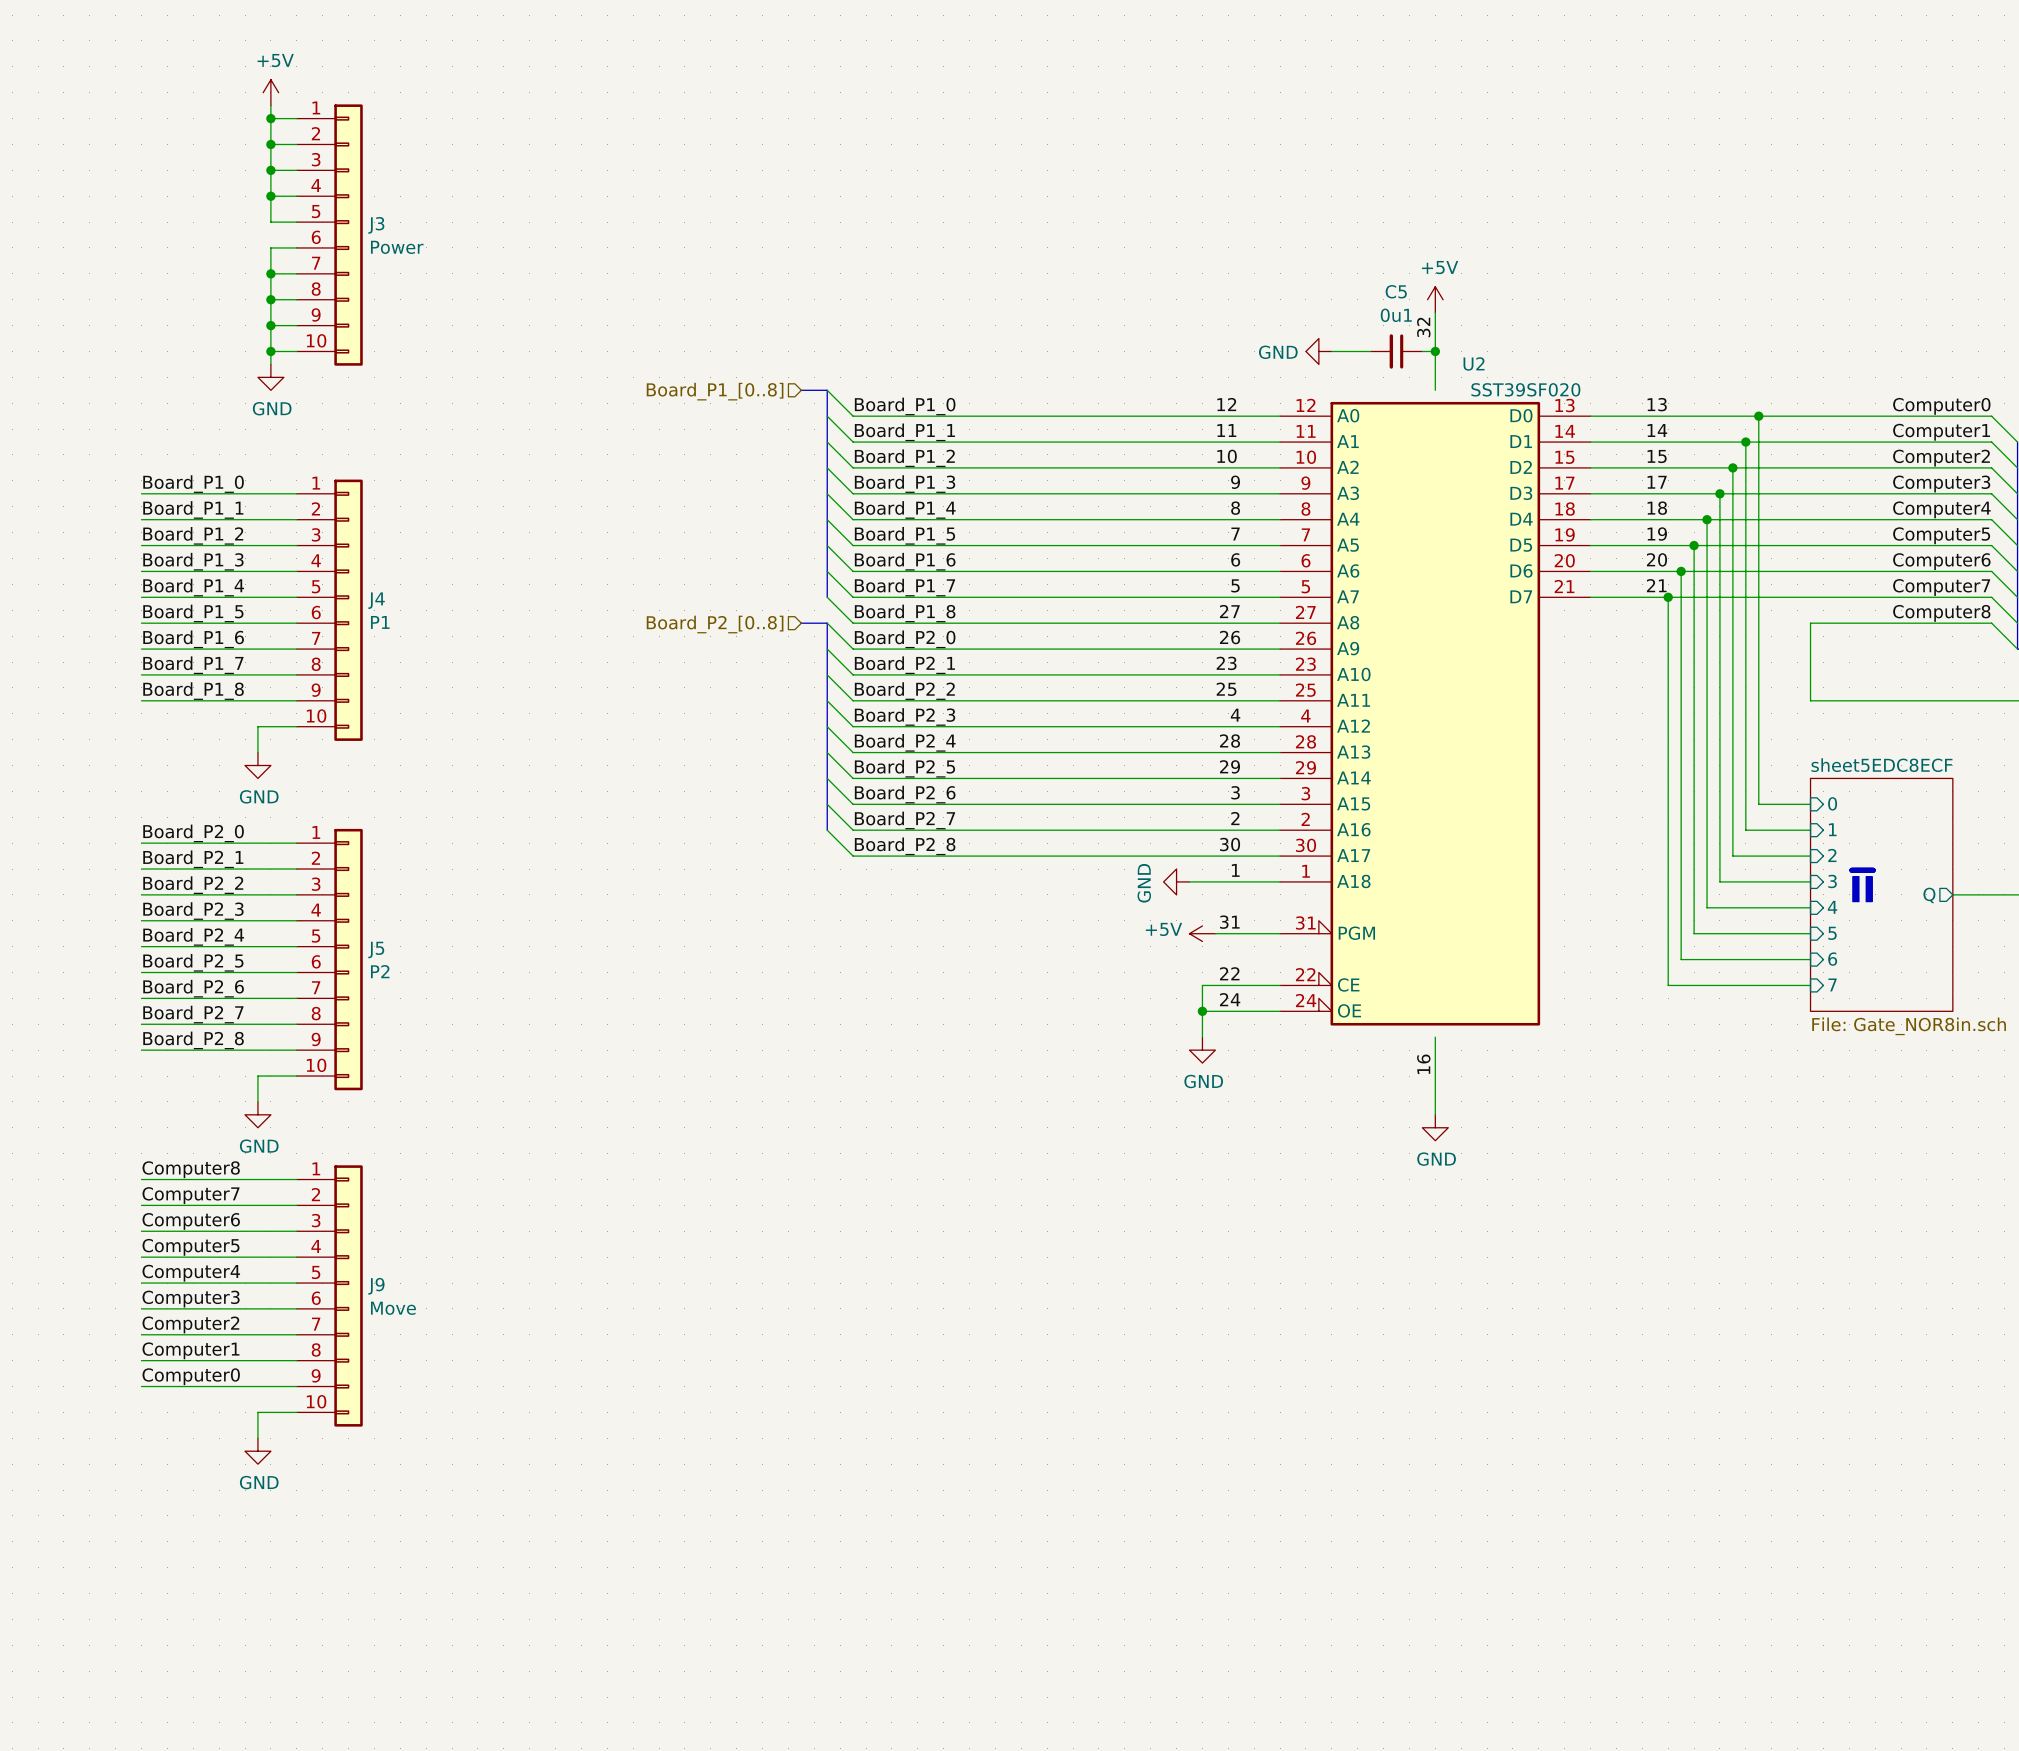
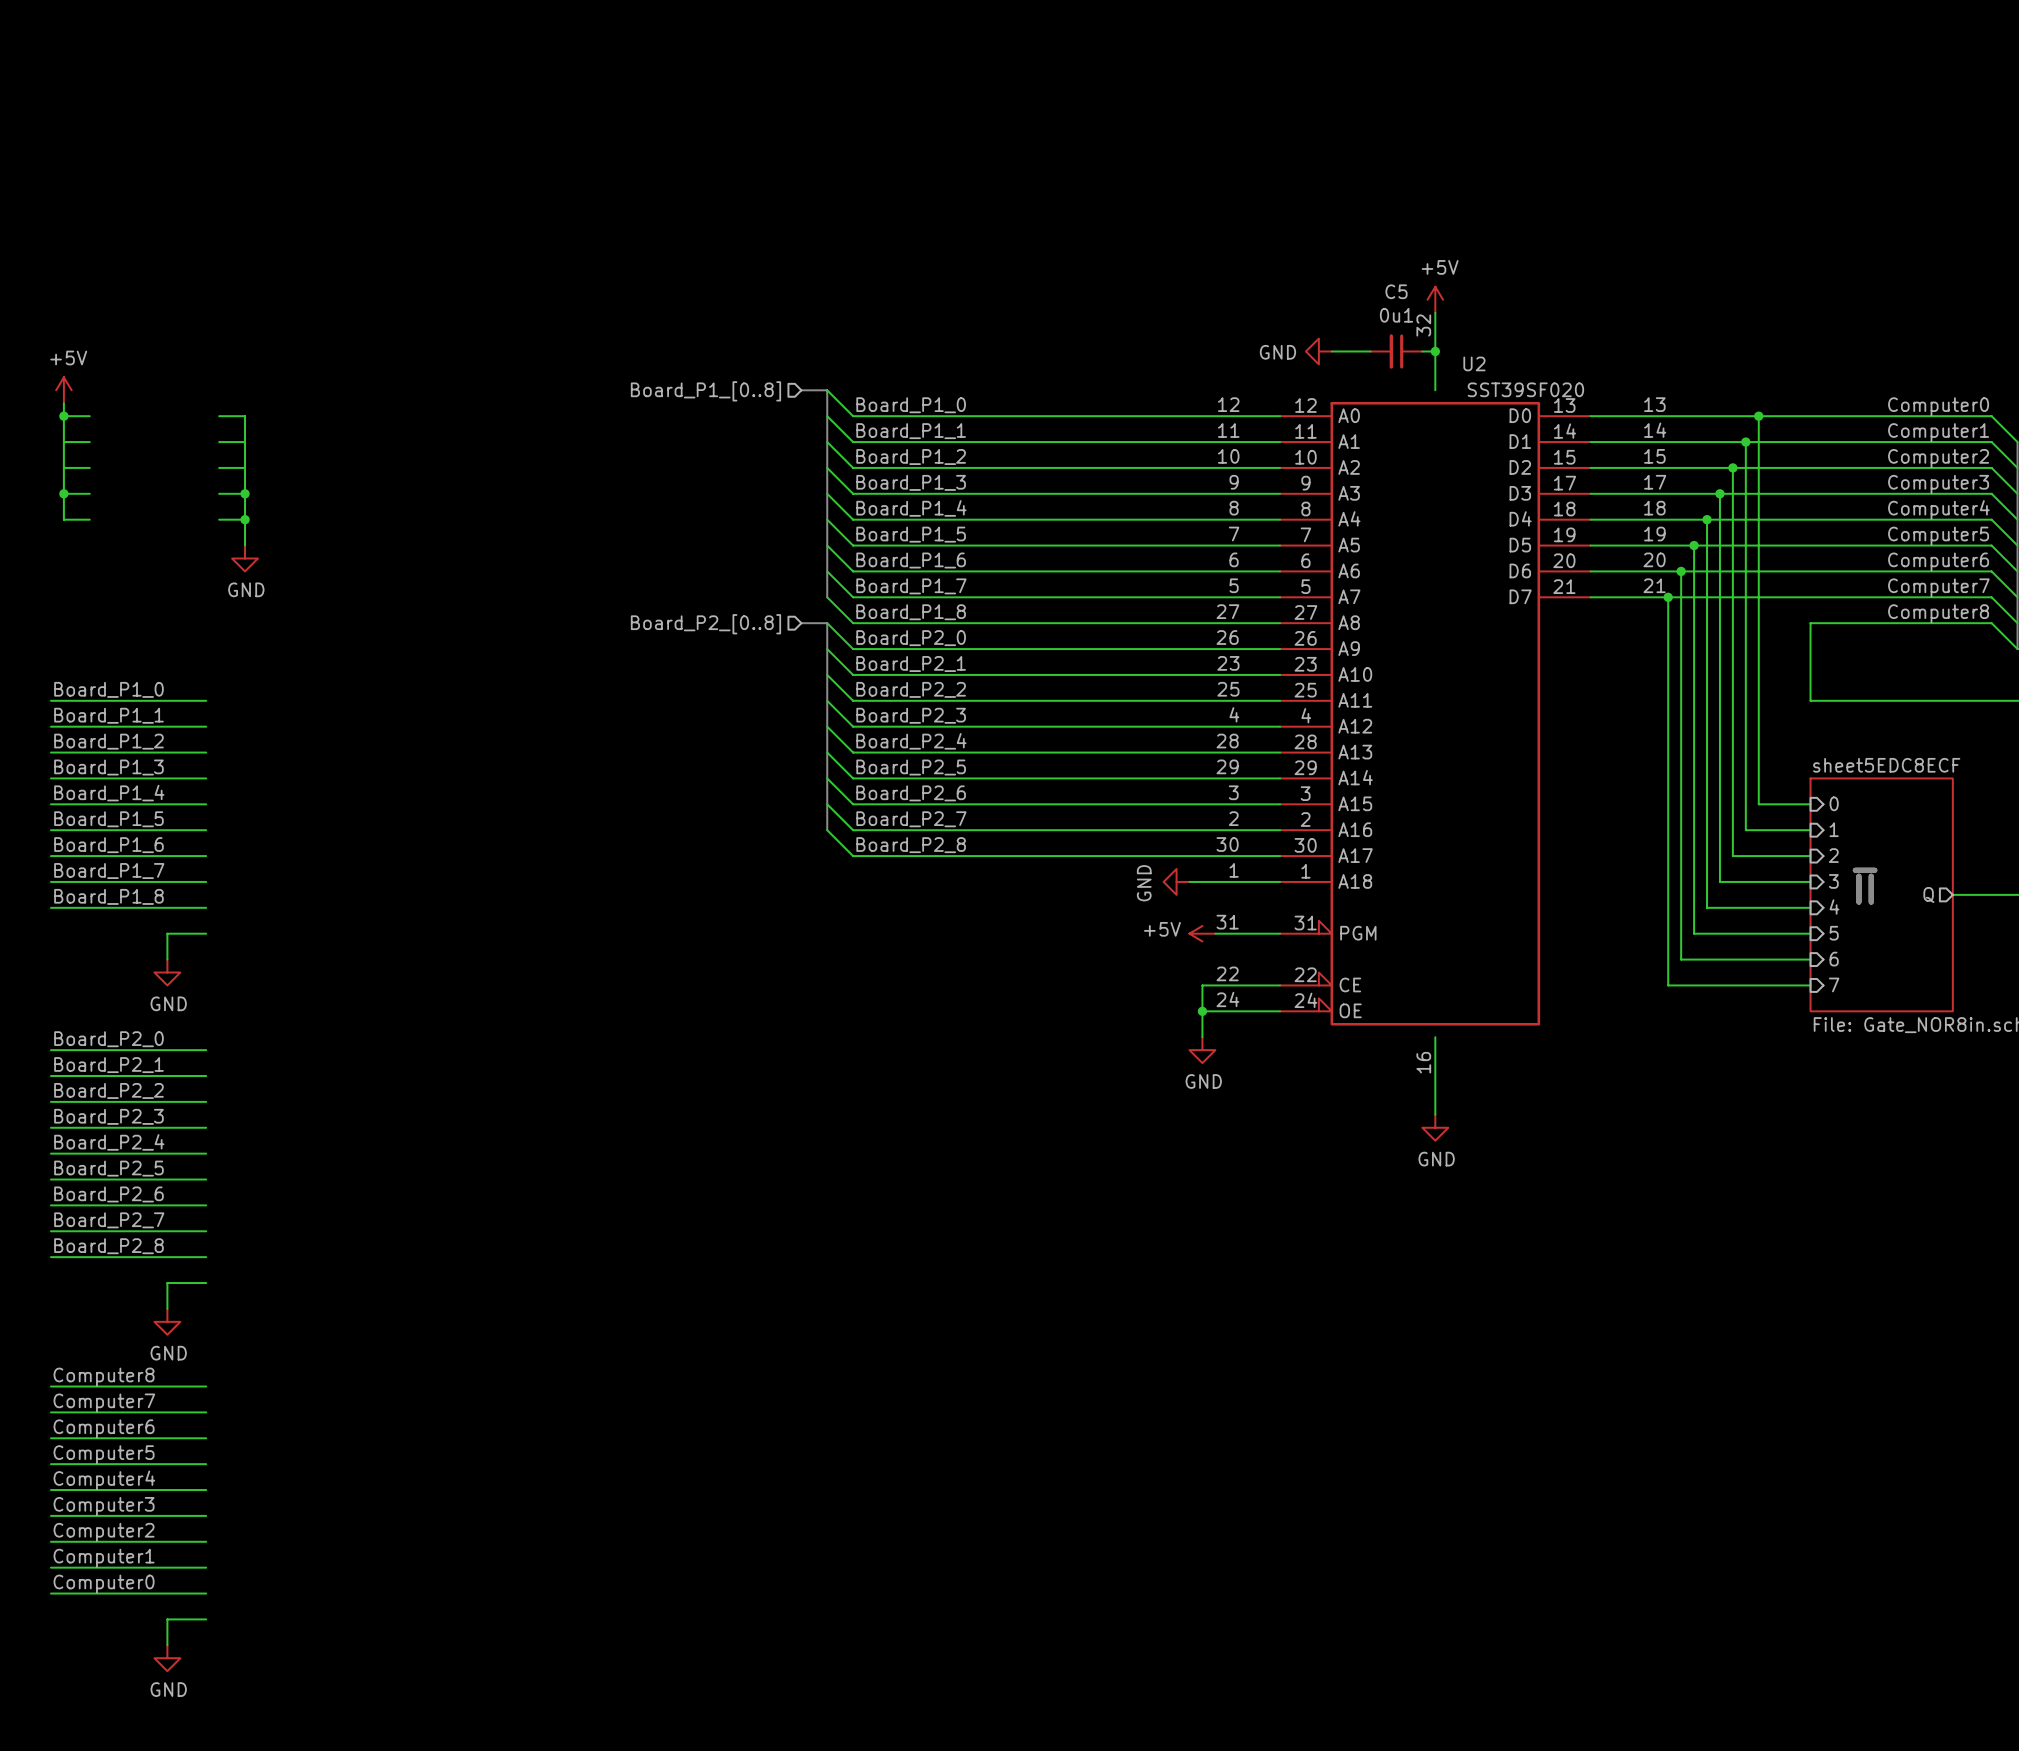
power symbol: +5V (270, 92) -> none
wire: (270, 105) (270, 222) (296, 222) -> none
wire: (270, 118) (296, 118) -> none
junction: (270, 118) -> none
wire: (270, 144) (296, 144) -> none
junction: (270, 144) -> none
wire: (270, 170) (296, 170) -> none
junction: (270, 170) -> none
wire: (270, 196) (296, 196) -> (219, 442) (245, 442)
junction: (270, 196) -> none
J3: Power (329, 235) -> none
wire: (296, 247) (270, 247) (270, 364) -> none
wire: (270, 273) (296, 273) -> (63, 416) (89, 416)
junction: (270, 273) -> none
wire: (270, 299) (296, 299) -> (63, 442) (89, 442)
junction: (270, 299) -> none
wire: (270, 325) (296, 325) -> (63, 467) (89, 467)
junction: (270, 325) -> none
wire: (270, 351) (296, 351) -> (63, 493) (89, 493)
junction: (270, 351) -> none
power symbol: GND (270, 377) -> none
power symbol: none -> +5V (63, 390)
wire: none -> (63, 403) (63, 519) (89, 519)
junction: none -> (63, 416)
wire: none -> (219, 416) (245, 416) (245, 545)
wire: none -> (219, 467) (245, 467)
label position: Board_P1_0 (193, 484) -> Board_P1_0 (108, 689)
junction: none -> (63, 493)
wire: (141, 493) (219, 493) -> none
wire: (245, 493) (296, 493) -> none
junction: none -> (245, 493)
label position: Board_P1_1 (193, 509) -> Board_P1_1 (108, 715)
wire: (141, 519) (219, 519) -> none
wire: (245, 519) (296, 519) -> none
junction: none -> (245, 519)
label position: Board_P1_2 (193, 535) -> Board_P1_2 (108, 741)
wire: (141, 545) (296, 545) -> (50, 752) (206, 752)
power symbol: none -> GND (245, 558)
label position: Board_P1_3 (193, 561) -> Board_P1_3 (108, 767)
wire: (141, 571) (296, 571) -> (50, 778) (206, 778)
label position: Board_P1_4 (193, 587) -> Board_P1_4 (109, 793)
wire: (141, 597) (296, 597) -> (50, 804) (206, 804)
J4: P1 (329, 610) -> none
label position: Board_P1_5 (193, 613) -> Board_P1_5 (108, 819)
wire: (141, 623) (296, 623) -> (50, 830) (206, 830)
label position: Board_P1_6 (193, 639) -> Board_P1_6 (108, 845)
wire: (141, 649) (296, 649) -> (50, 856) (206, 856)
label position: Board_P1_7 (193, 665) -> Board_P1_7 (109, 871)
wire: (141, 674) (296, 674) -> (50, 881) (206, 881)
label position: Board_P1_8 (193, 691) -> Board_P1_8 (108, 896)
wire: (206, 700) (296, 700) -> (50, 700) (141, 700)
wire: (296, 726) (257, 726) (257, 752) -> (206, 933) (167, 933) (167, 959)
power symbol: GND (257, 765) -> none
label position: Board_P2_0 (193, 833) -> Board_P2_0 (108, 1039)
wire: (141, 843) (296, 843) -> (50, 726) (206, 726)
label position: Board_P2_1 (193, 859) -> Board_P2_1 (108, 1065)
wire: (141, 869) (296, 869) -> (50, 1076) (206, 1076)
label position: Board_P2_2 (193, 885) -> Board_P2_2 (108, 1090)
wire: (141, 894) (296, 894) -> (50, 1101) (206, 1101)
label position: Board_P2_3 (193, 911) -> Board_P2_3 (108, 1116)
wire: (141, 920) (296, 920) -> (50, 1127) (206, 1127)
label position: Board_P2_4 (193, 936) -> Board_P2_4 (109, 1142)
wire: (141, 946) (296, 946) -> (50, 1153) (206, 1153)
J5: P2 (329, 959) -> none
label position: Board_P2_5 (193, 962) -> Board_P2_5 (108, 1168)
wire: (141, 972) (296, 972) -> none
power symbol: none -> GND (167, 972)
label position: Board_P2_6 (193, 988) -> Board_P2_6 (108, 1194)
wire: (141, 998) (296, 998) -> none
label position: Board_P2_7 (193, 1014) -> Board_P2_7 (109, 1220)
wire: (141, 1024) (296, 1024) -> (50, 907) (206, 907)
label position: Board_P2_8 (193, 1040) -> Board_P2_8 (108, 1246)
wire: (206, 1050) (296, 1050) -> (50, 1050) (141, 1050)
wire: (296, 1076) (257, 1076) (257, 1101) -> none
power symbol: GND (257, 1114) -> none
label position: Computer8 (191, 1169) -> Computer8 (104, 1377)
wire: (206, 1179) (296, 1179) -> (50, 1179) (141, 1179)
label position: Computer7 (191, 1195) -> Computer7 (104, 1403)
wire: (206, 1205) (296, 1205) -> (50, 1205) (141, 1205)
label position: Computer6 (191, 1221) -> Computer6 (104, 1428)
wire: (206, 1231) (296, 1231) -> (50, 1231) (141, 1231)
label position: Computer5 (191, 1247) -> Computer5 (104, 1454)
wire: (206, 1257) (296, 1257) -> (50, 1257) (141, 1257)
label position: Computer4 (191, 1273) -> Computer4 (104, 1480)
wire: (141, 1283) (167, 1283) -> (167, 1308) (167, 1283)
wire: (206, 1283) (296, 1283) -> none
J9: Move (329, 1295) -> none
label position: Computer3 (191, 1299) -> Computer3 (104, 1506)
wire: (141, 1308) (296, 1308) -> (50, 1515) (206, 1515)
power symbol: none -> GND (167, 1321)
label position: Computer2 (190, 1324) -> Computer2 (104, 1532)
wire: (141, 1334) (296, 1334) -> (50, 1541) (206, 1541)
label position: Computer1 (190, 1350) -> Computer1 (104, 1558)
wire: (141, 1360) (296, 1360) -> (50, 1567) (206, 1567)
label position: Computer0 (191, 1376) -> Computer0 (104, 1584)
wire: (206, 1386) (296, 1386) -> (50, 1386) (141, 1386)
wire: none -> (50, 1412) (206, 1412)
wire: (296, 1412) (257, 1412) (257, 1438) -> (206, 1619) (167, 1619) (167, 1645)
wire: none -> (50, 1438) (206, 1438)
power symbol: GND (257, 1451) -> none
wire: none -> (50, 1464) (206, 1464)
wire: none -> (50, 1490) (206, 1490)
wire: none -> (50, 1593) (206, 1593)
power symbol: none -> GND (167, 1658)

